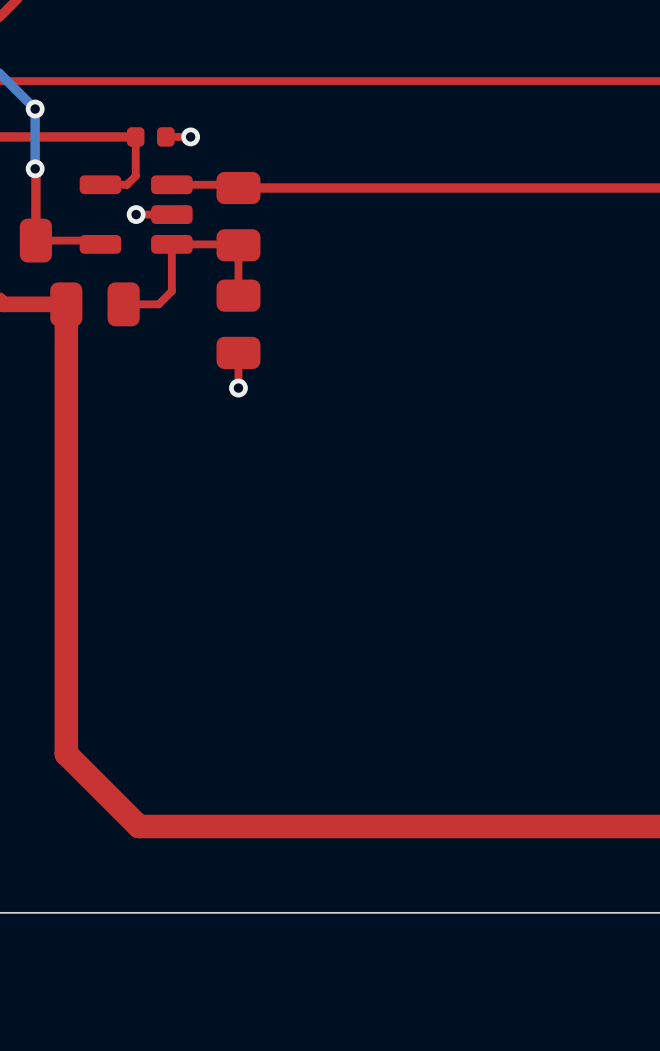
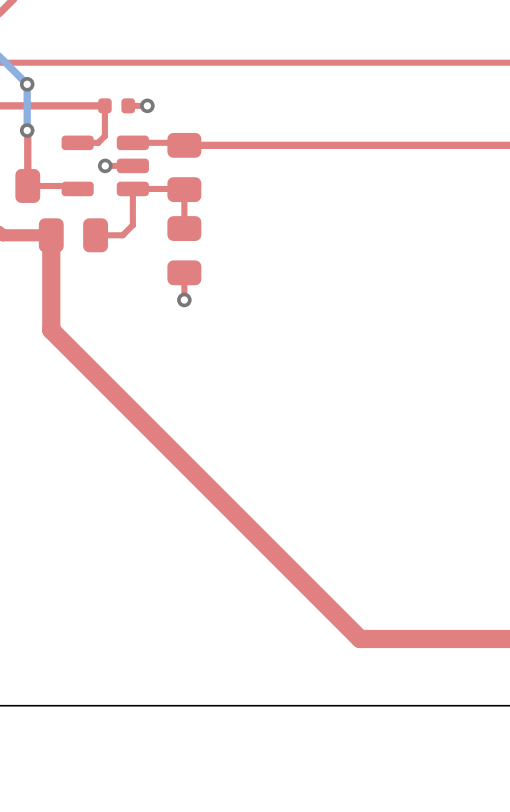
top track: (66, 427) (66, 753) (138, 826) (465, 826) -> (51, 330) (360, 638)

